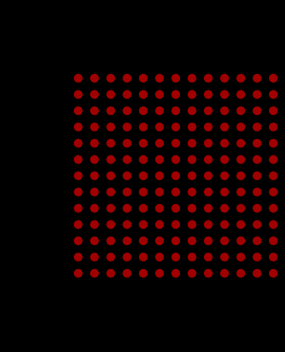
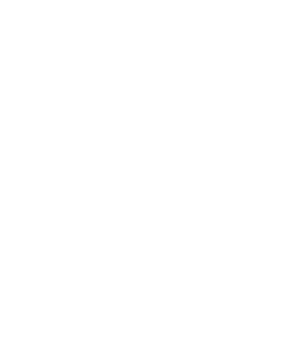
part: (175, 175) -> none

